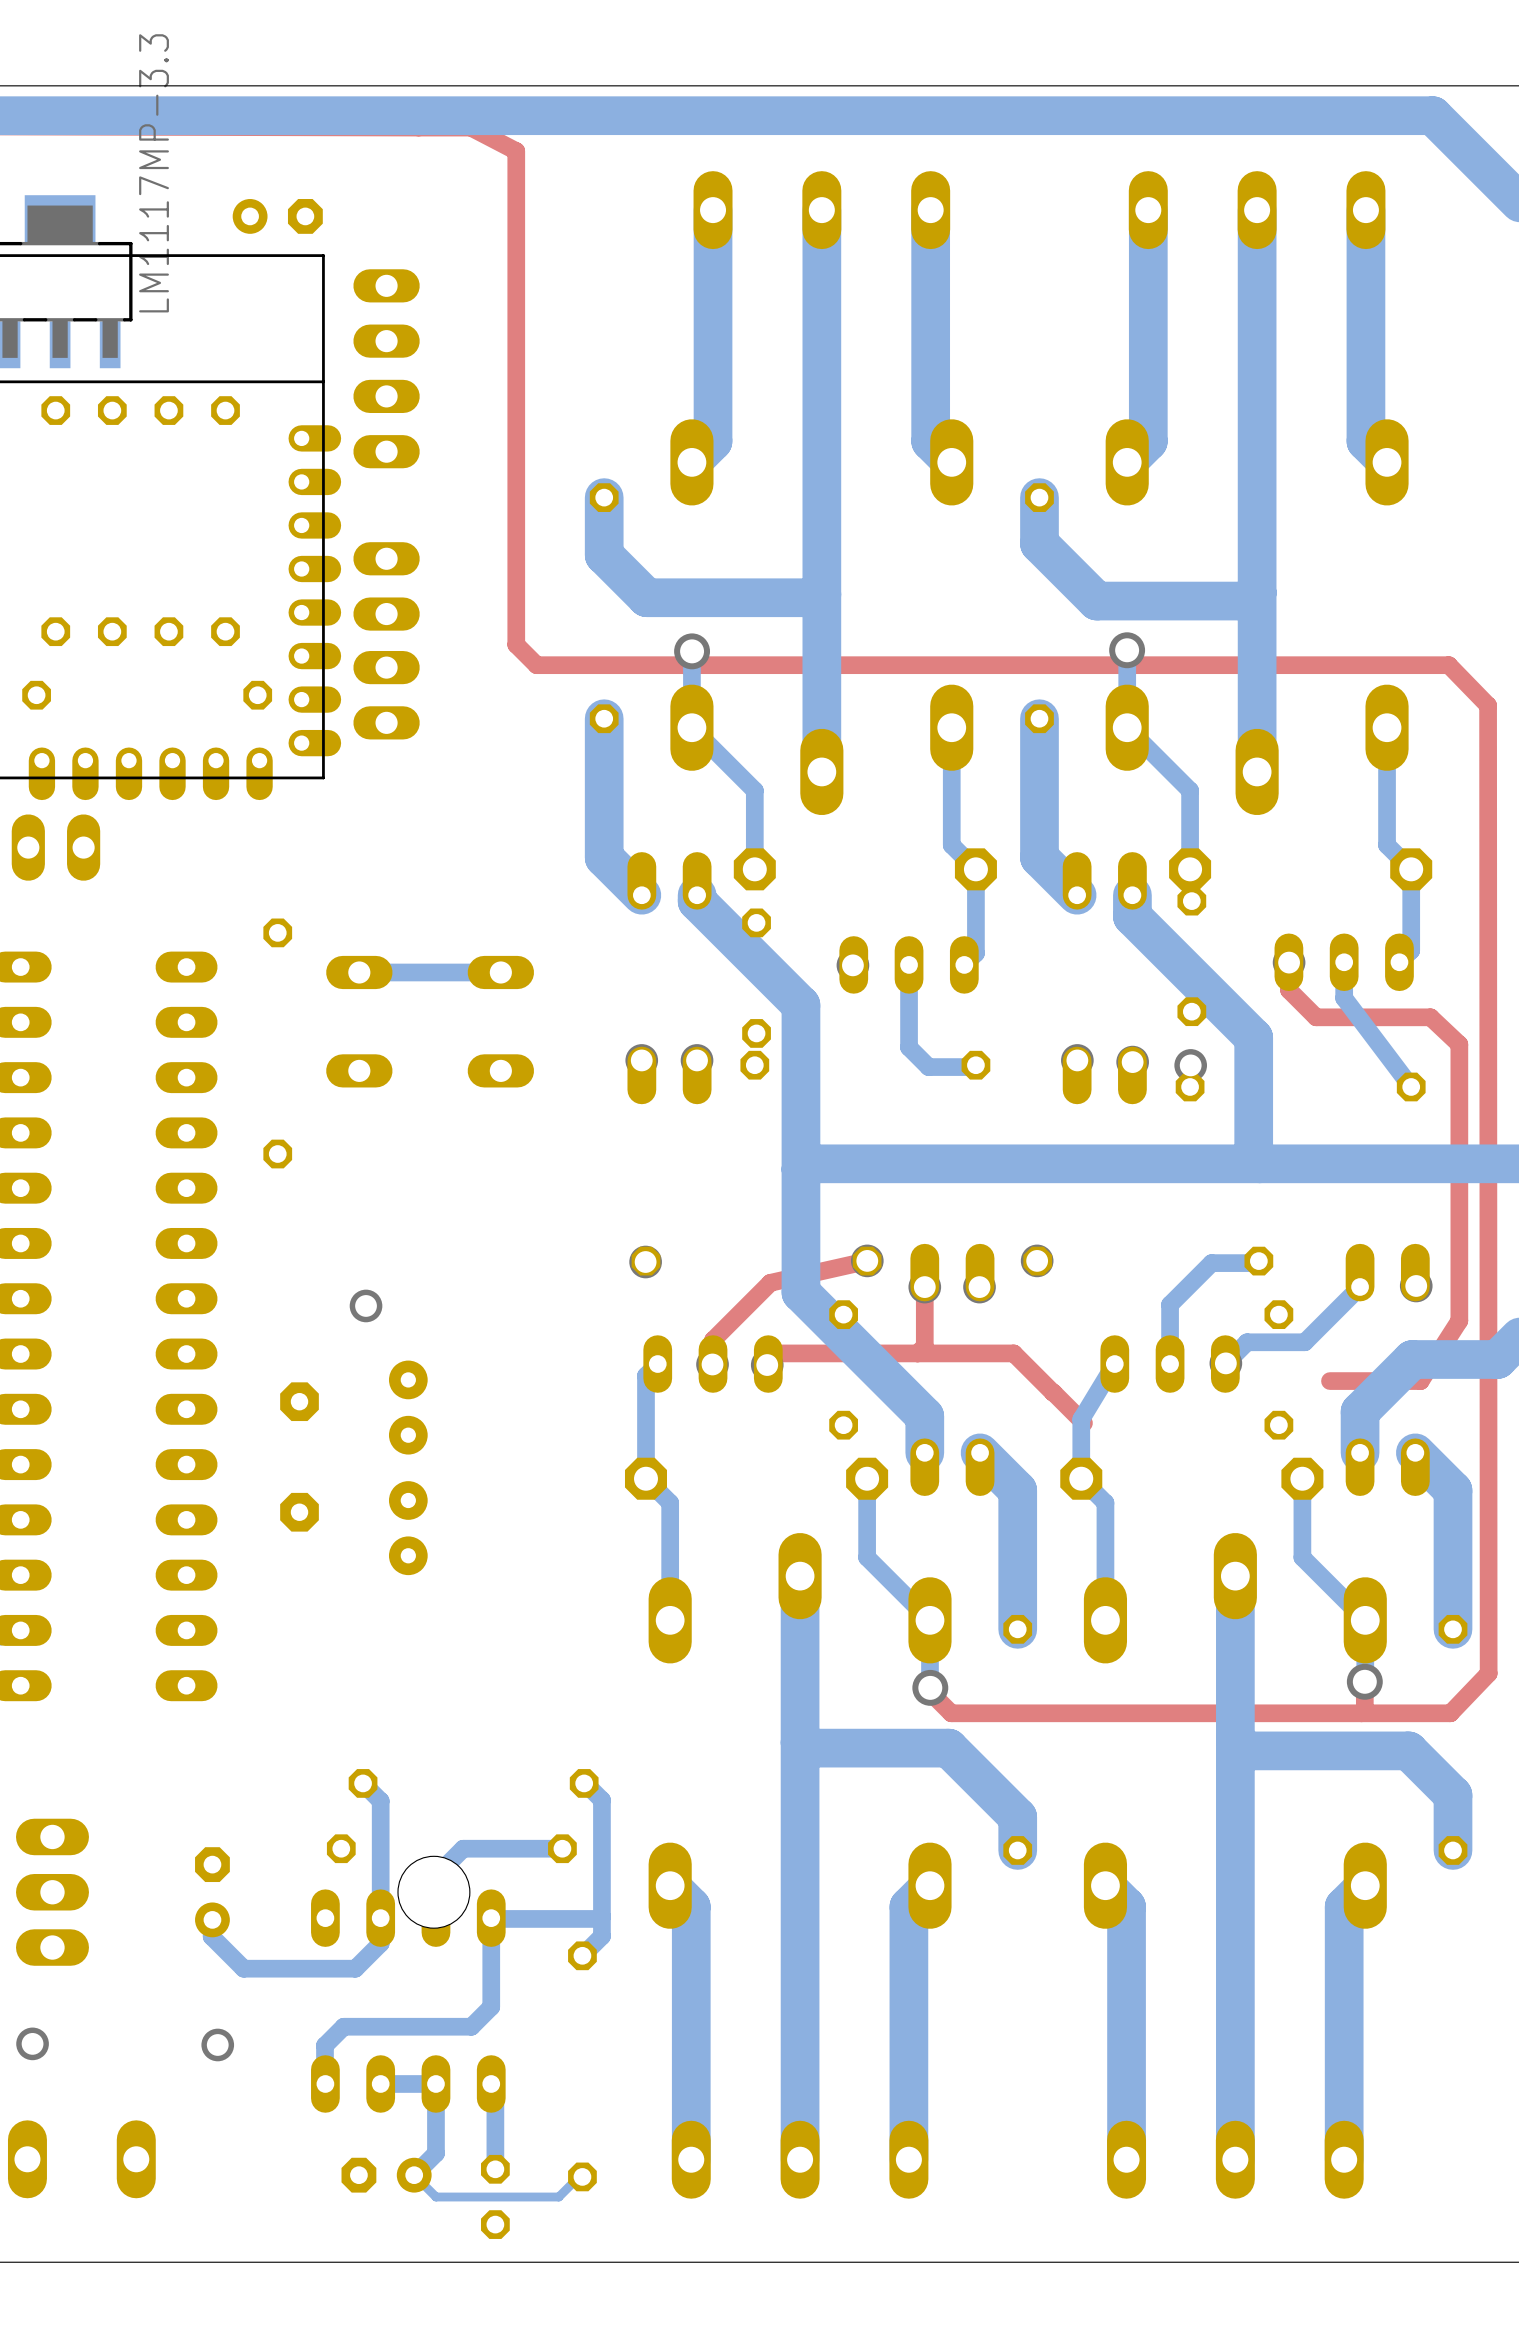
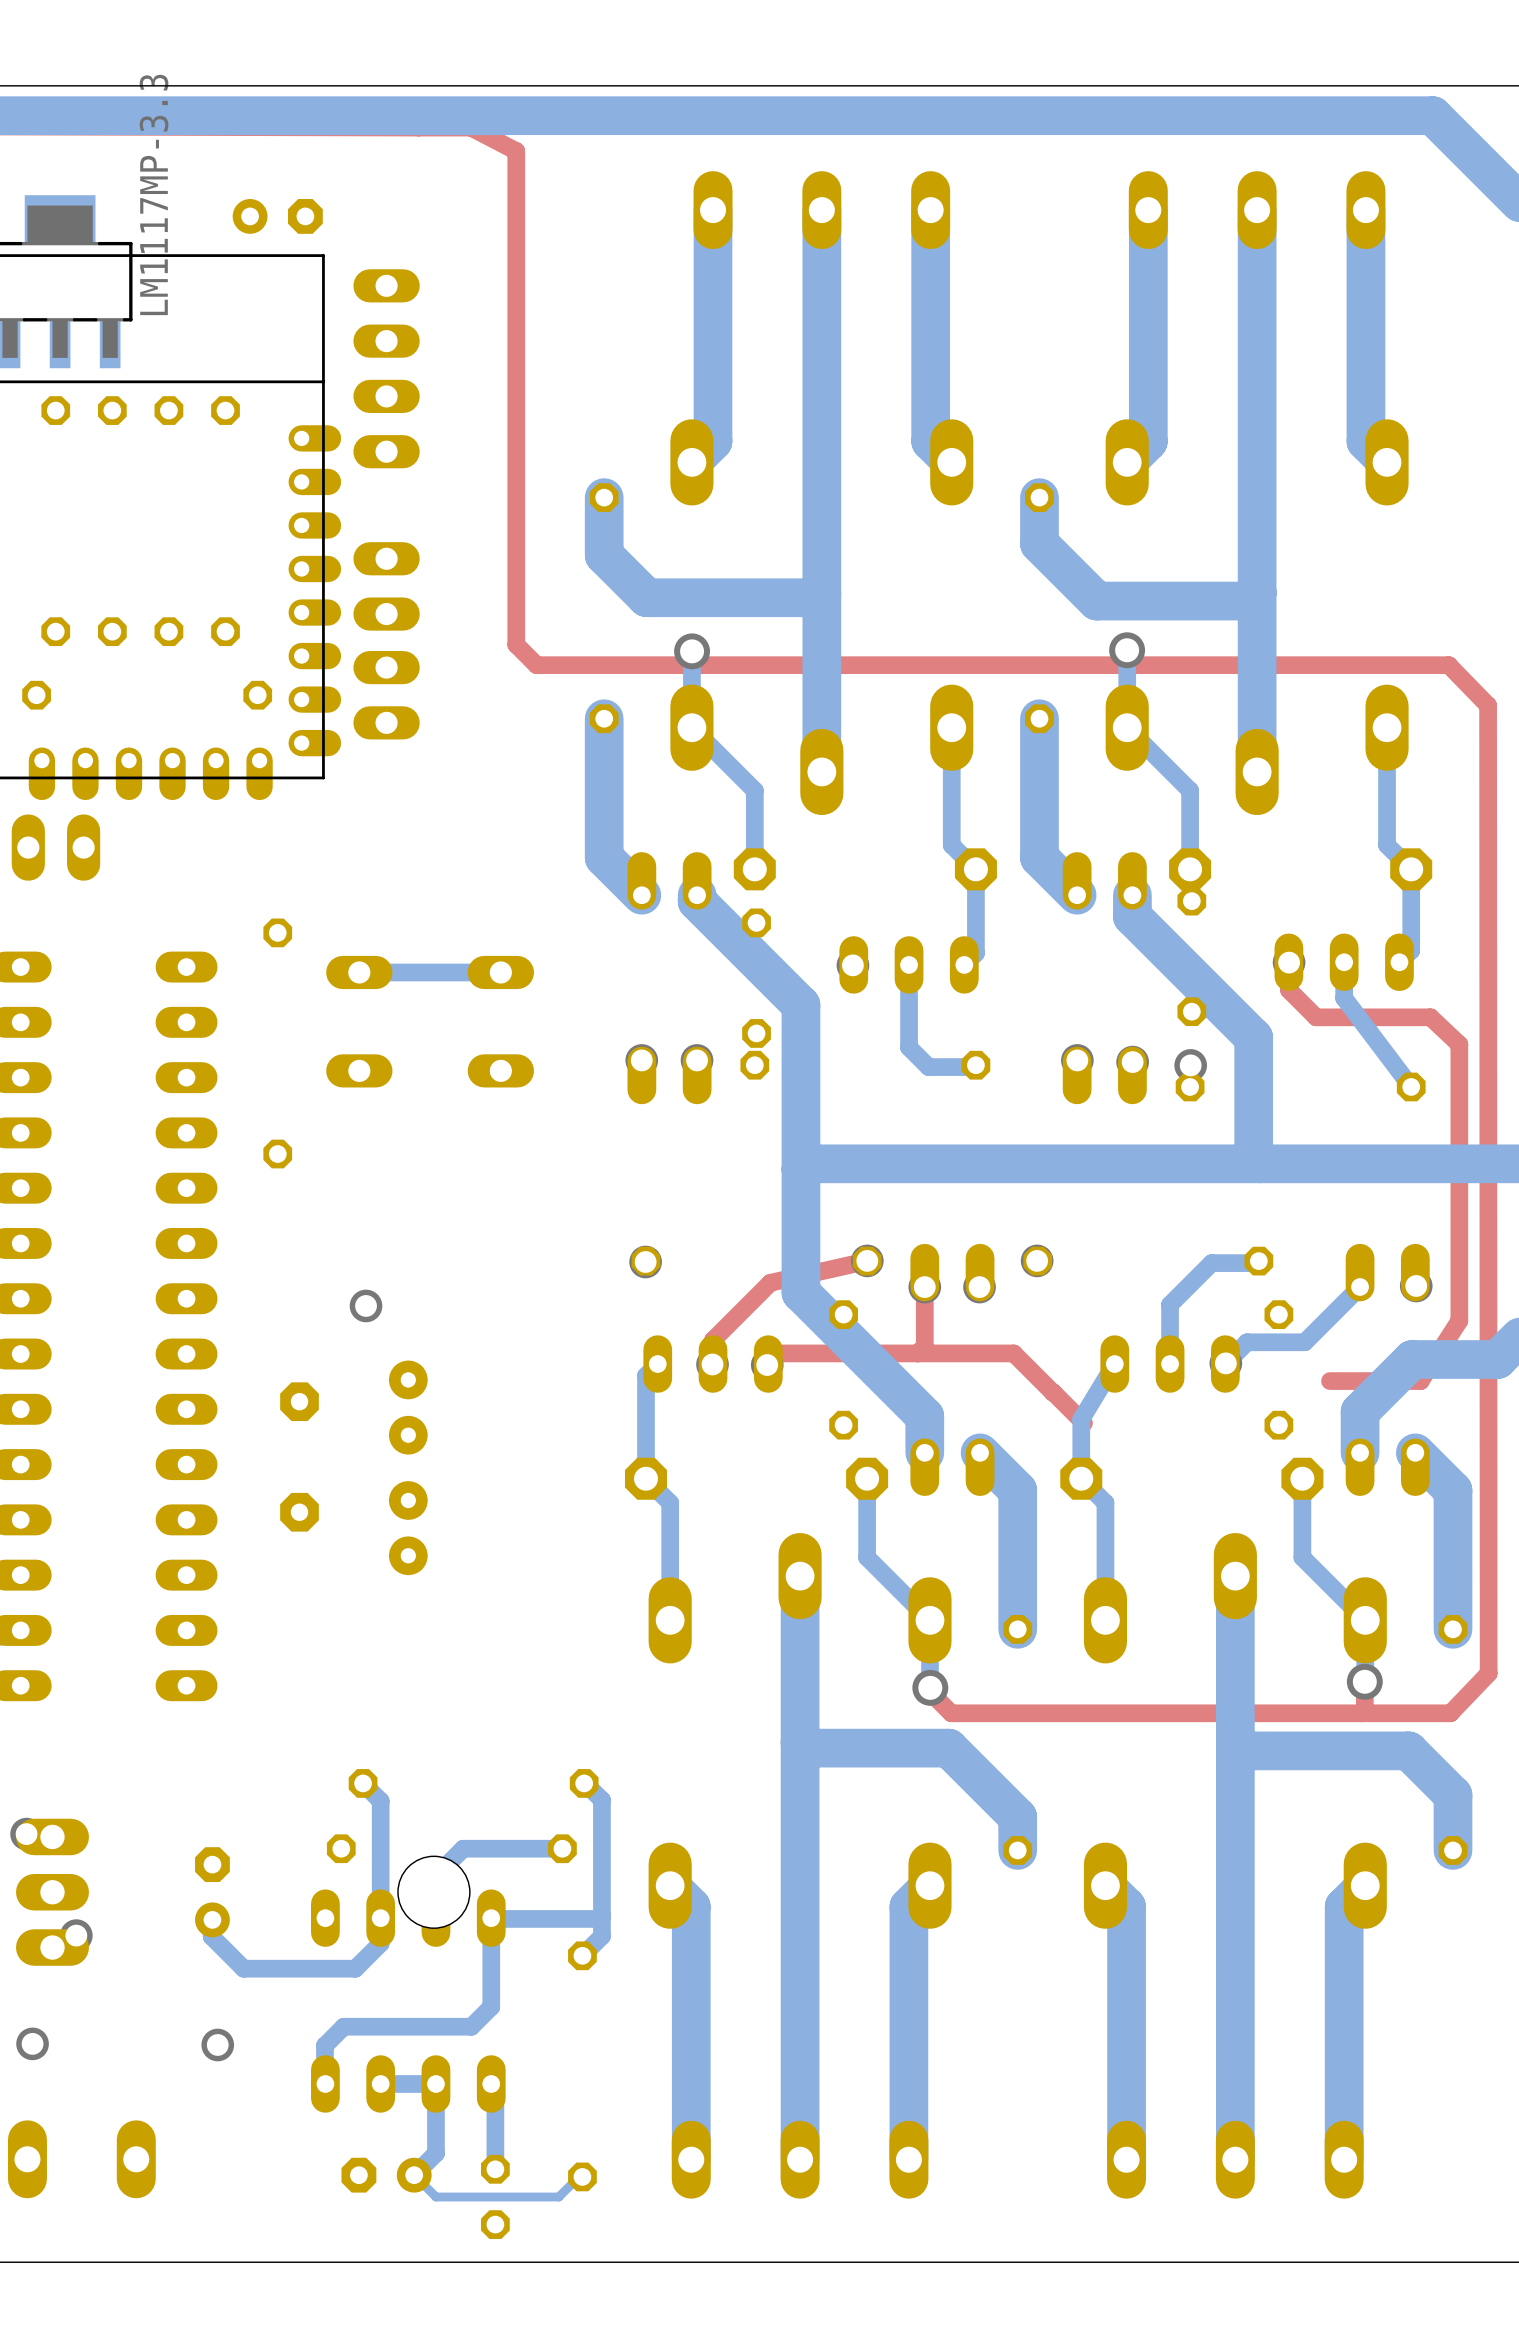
via: none -> (26, 1834)
via: none -> (76, 1935)

